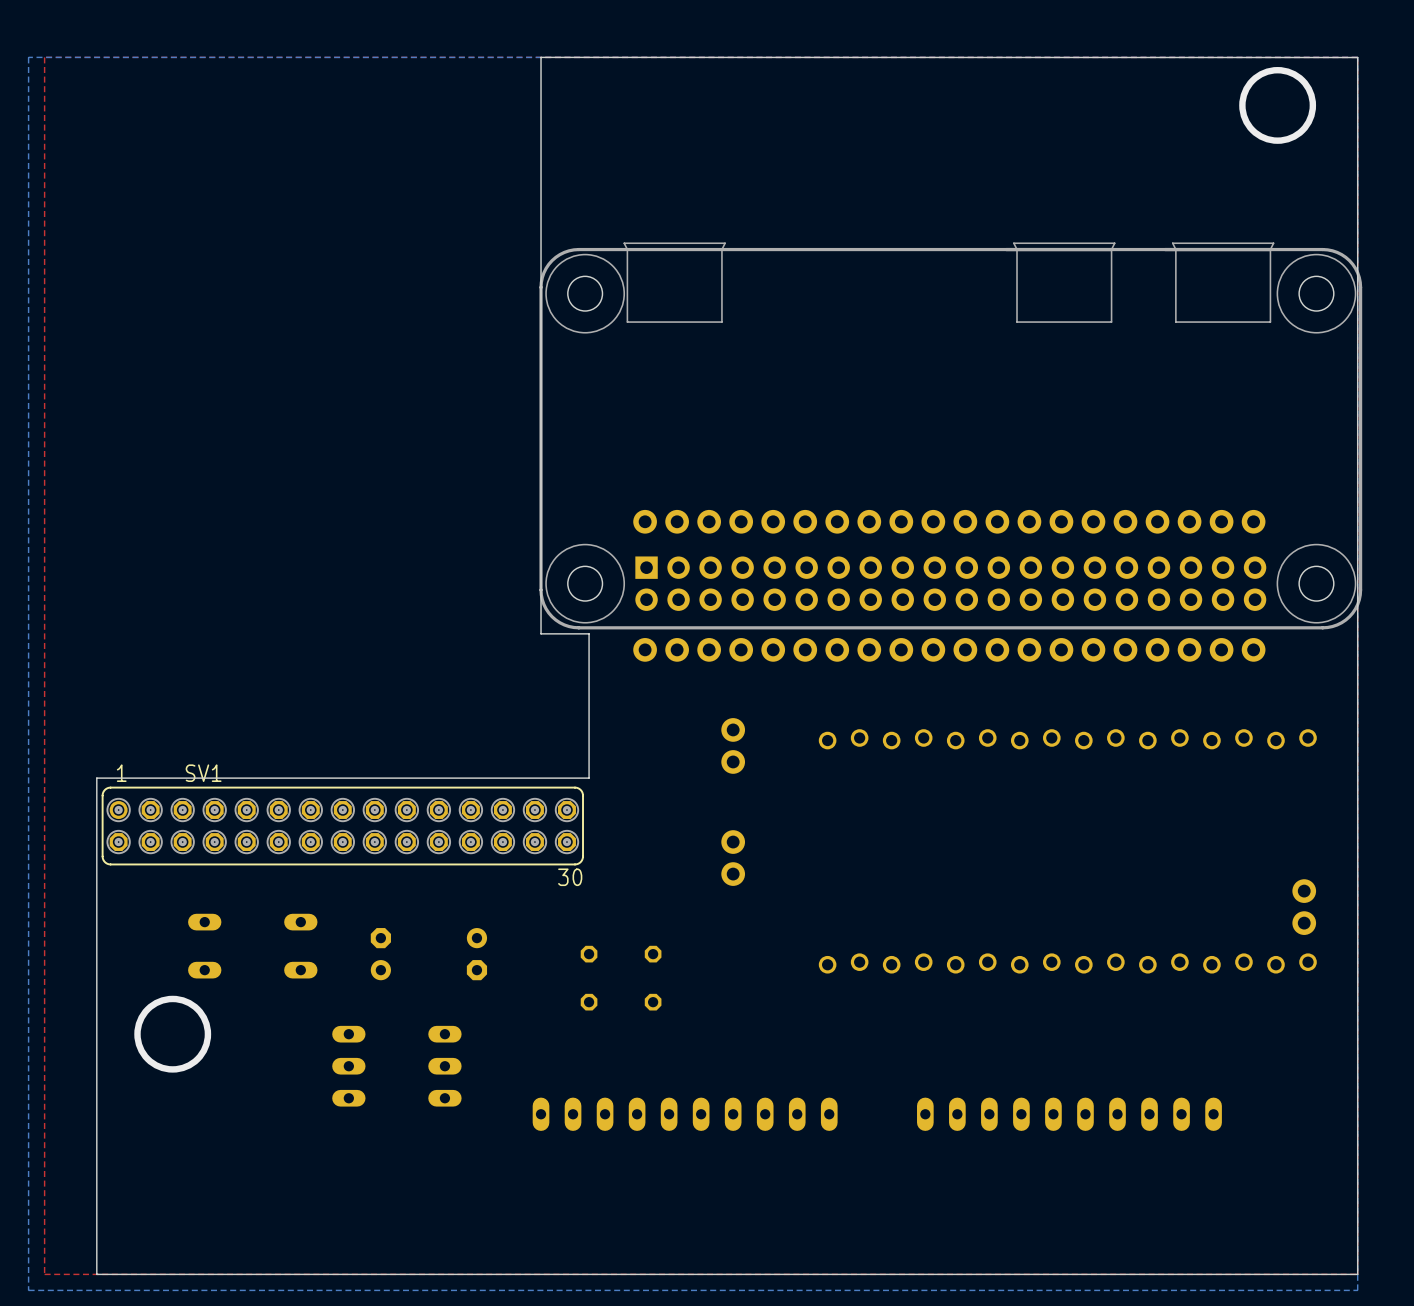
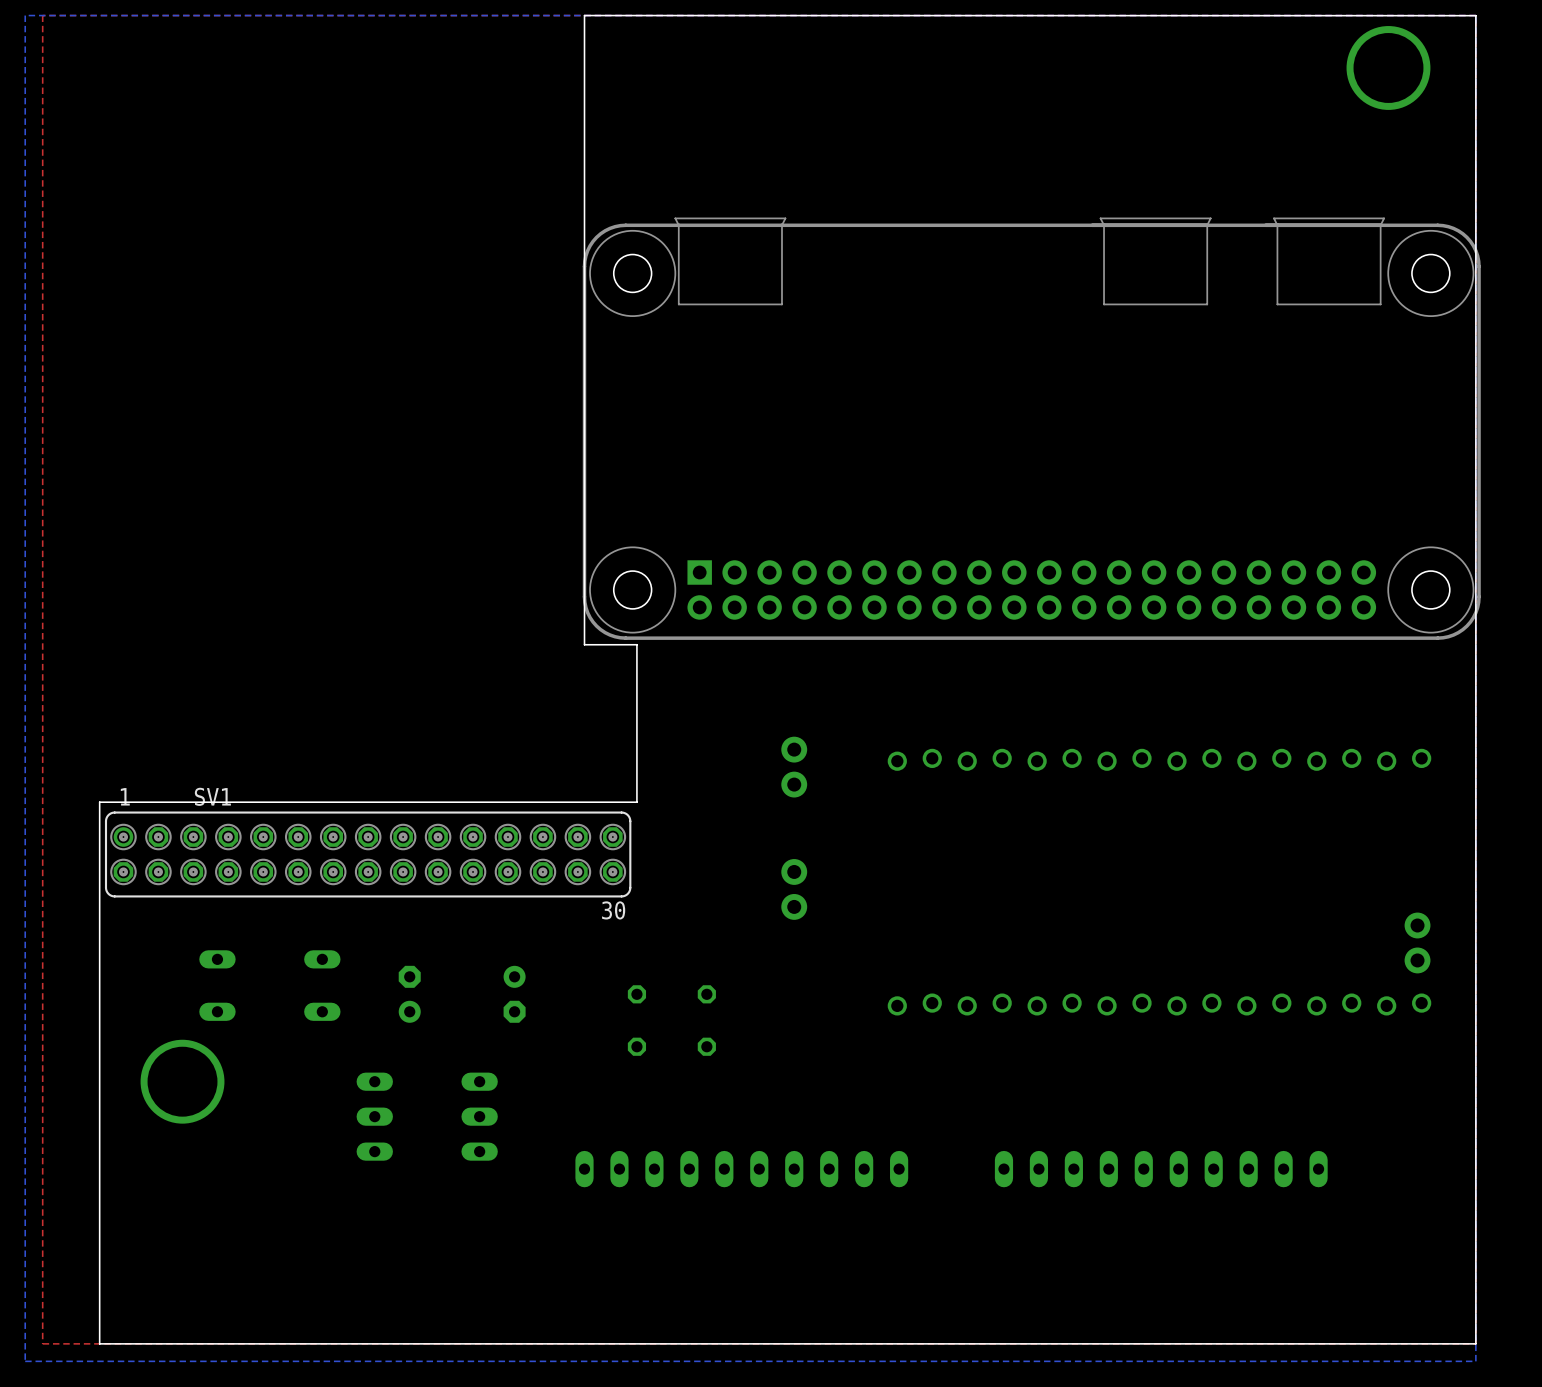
part: (949, 521) -> none
part: (949, 649) -> none

